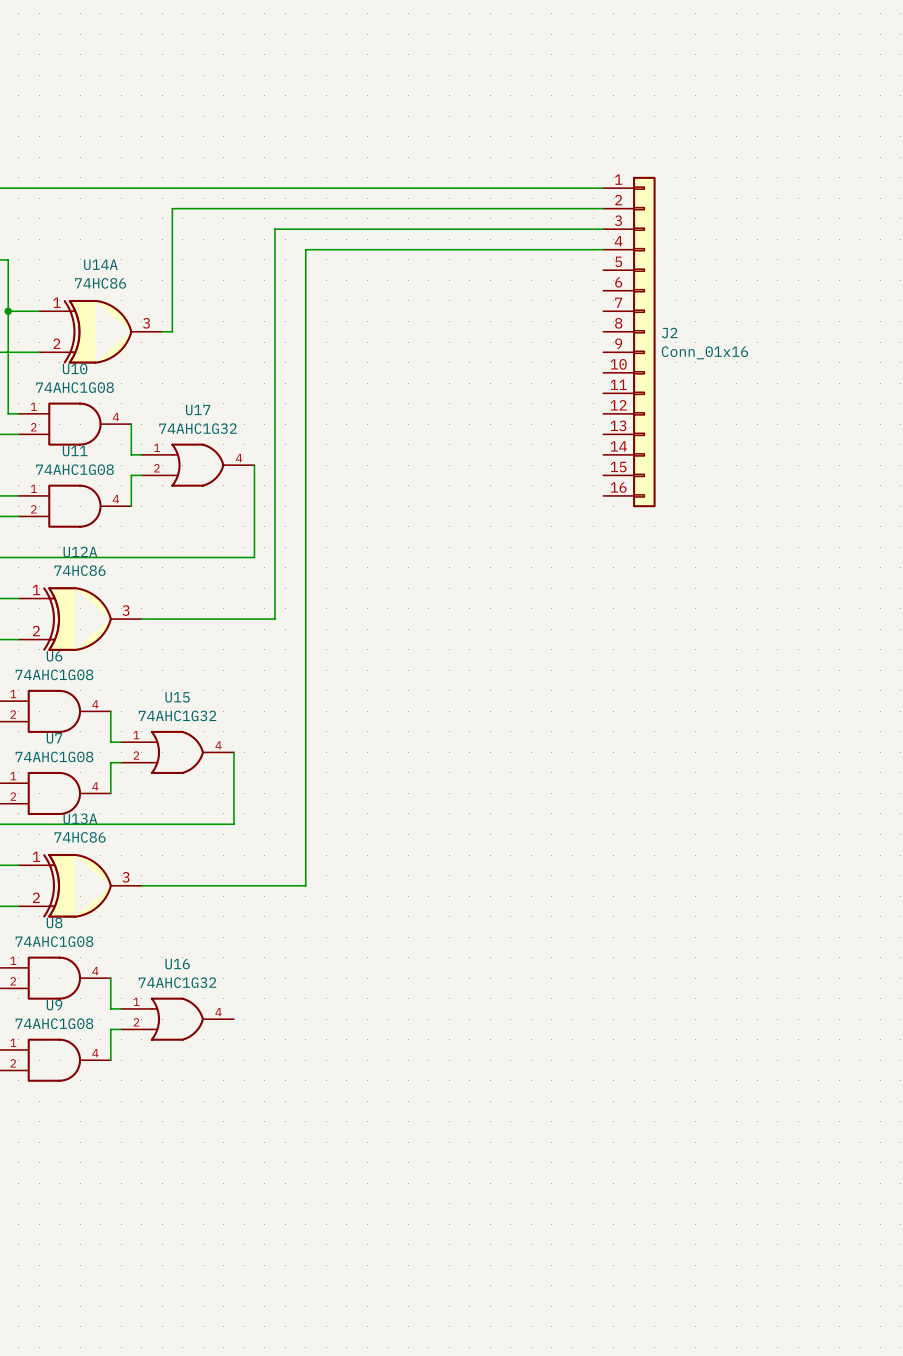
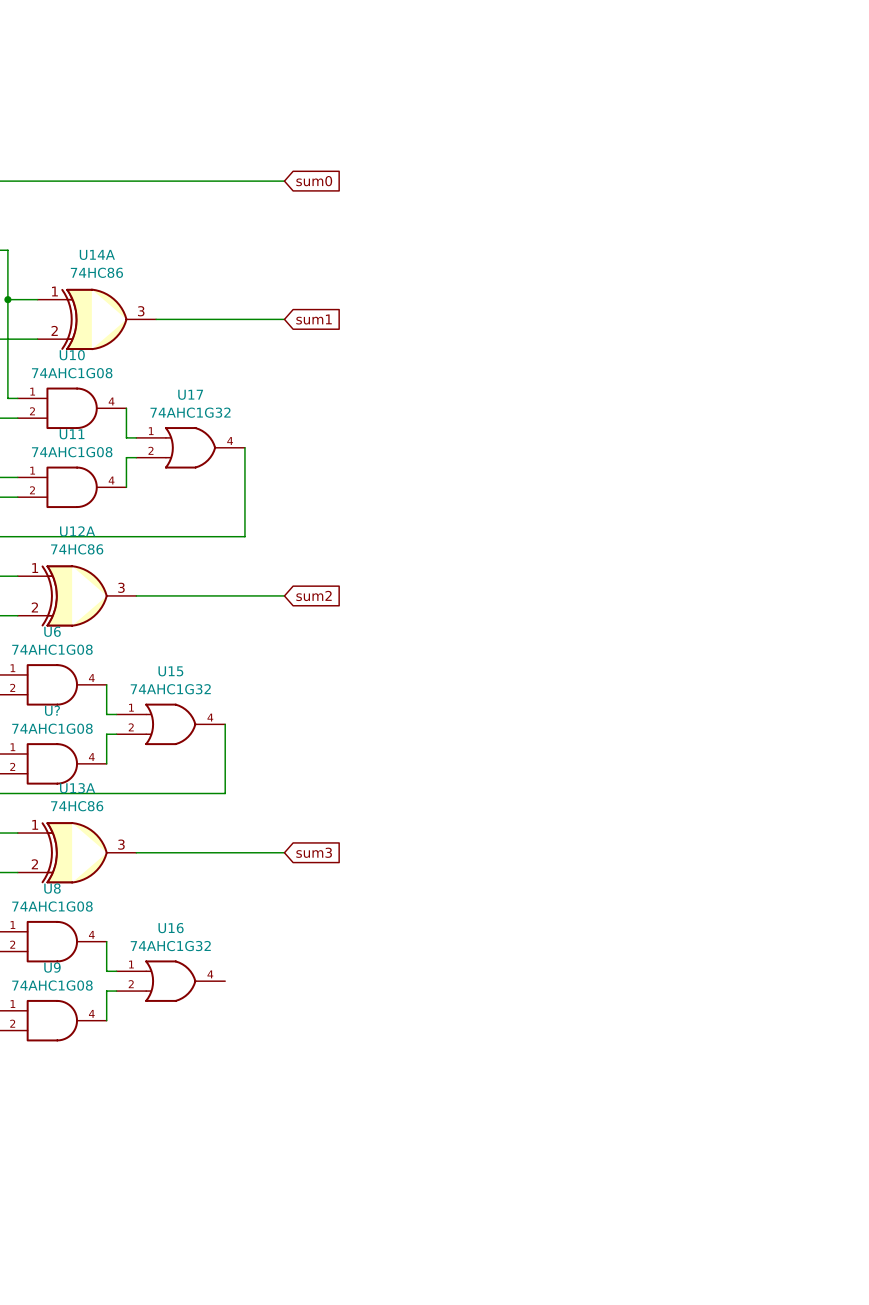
wire: (295, 188) (603, 188) -> none
global label: none -> sum0 (314, 181)
wire: (603, 208) (172, 208) (172, 331) -> (284, 319) (165, 319)
wire: (603, 229) (274, 229) (274, 619) -> (284, 595) (264, 595)
wire: (603, 249) (305, 249) (305, 885) (295, 885) -> none
global label: none -> sum1 (314, 319)
J2: Conn_01x16 (629, 342) -> none
global label: none -> sum2 (314, 595)
U7 name: U7 (54, 738) -> U? (52, 710)
global label: none -> sum3 (314, 852)

